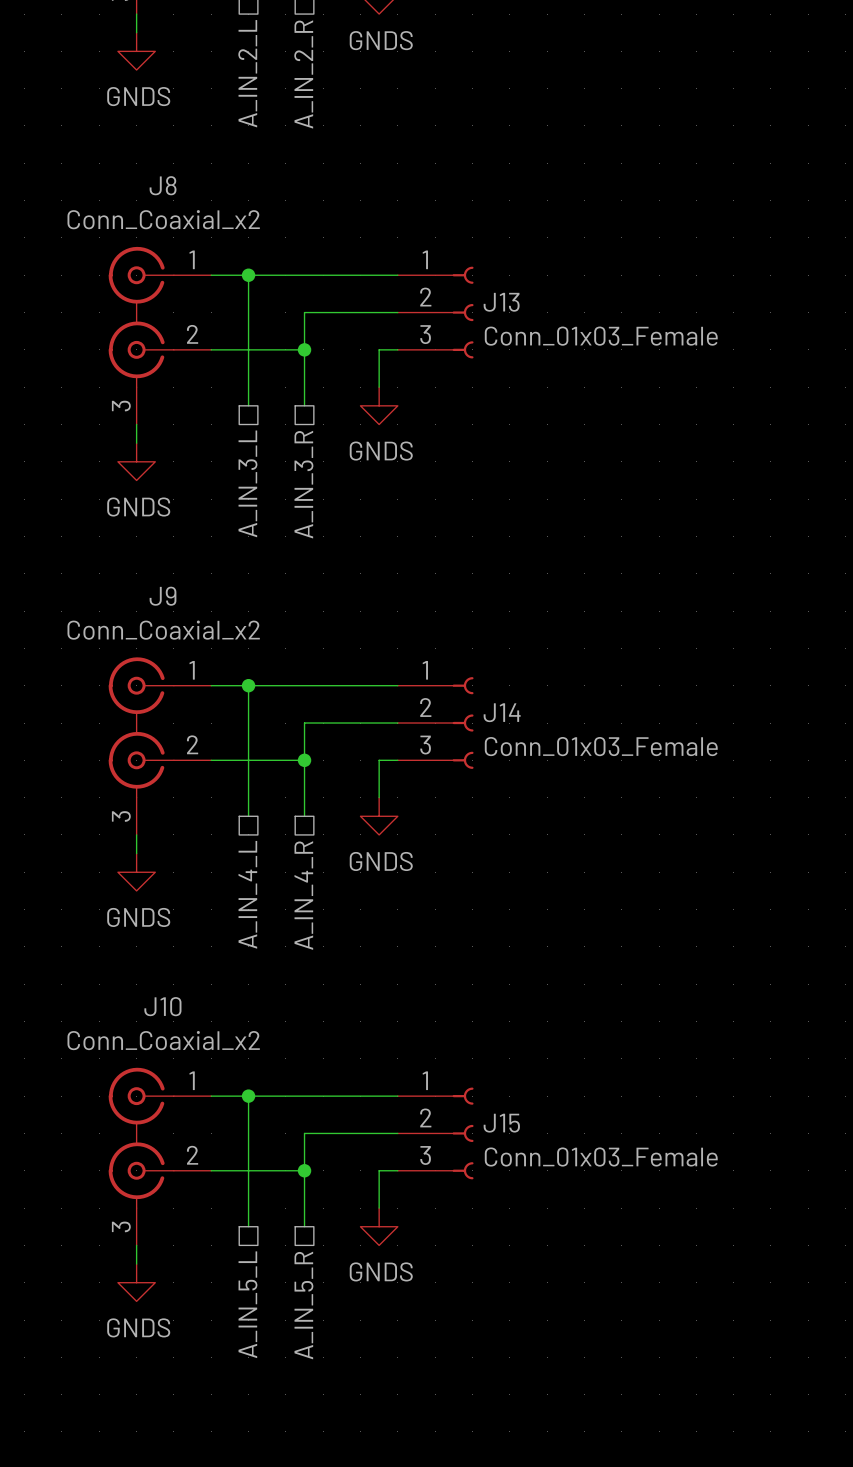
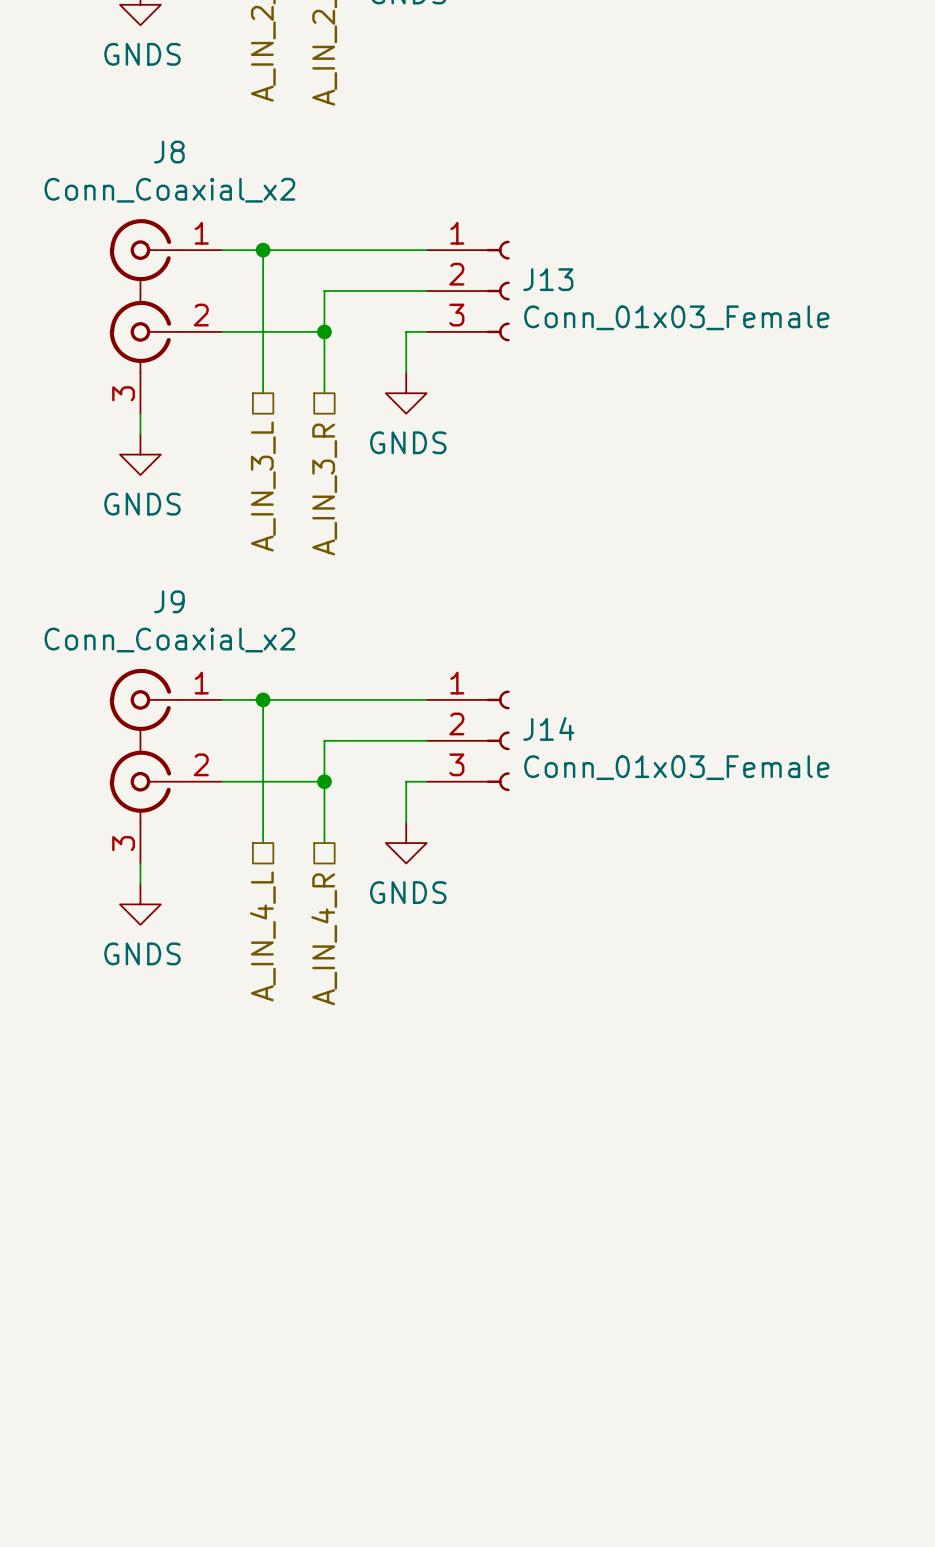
wire: (211, 1096) (397, 1096) -> none
wire: (248, 1096) (248, 1226) -> none
junction: (248, 1096) -> none
wire: (397, 1133) (304, 1133) (304, 1226) -> none
J15: Conn_01x03_Female (435, 1133) -> none
J10: Conn_Coaxial_x2 (159, 1156) -> none
wire: (211, 1170) (304, 1170) -> none
junction: (304, 1170) -> none
wire: (397, 1170) (379, 1170) (379, 1208) -> none
power symbol: GNDS (379, 1226) -> none
wire: (136, 1245) (136, 1264) -> none
power symbol: GNDS (136, 1282) -> none
hierarchical label: A_IN_5_L (247, 1304) -> none
hierarchical label: A_IN_5_R (303, 1305) -> none

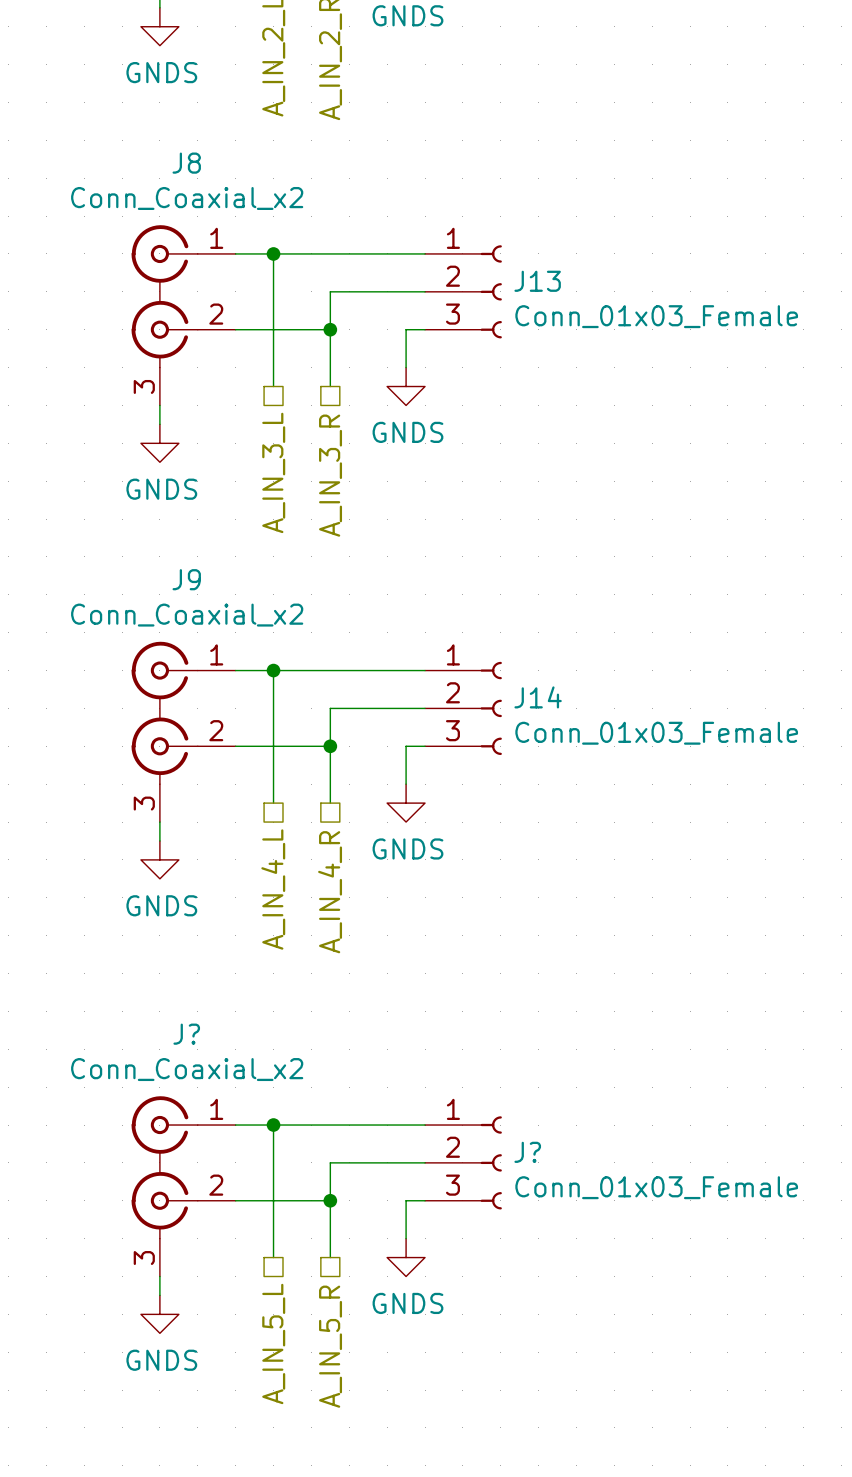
wire: none -> (235, 1125) (425, 1125)
wire: none -> (273, 1125) (273, 1257)
junction: none -> (273, 1125)
wire: none -> (425, 1162) (330, 1162) (330, 1257)
J?: none -> Conn_01x03_Female (463, 1162)
J?: none -> Conn_Coaxial_x2 (183, 1186)
wire: none -> (235, 1200) (330, 1200)
junction: none -> (330, 1200)
wire: none -> (425, 1200) (406, 1200) (406, 1238)
power symbol: none -> GNDS (406, 1257)
wire: none -> (159, 1276) (159, 1295)
power symbol: none -> GNDS (159, 1314)
hierarchical label: none -> A_IN_5_L (273, 1343)
hierarchical label: none -> A_IN_5_R (330, 1346)

